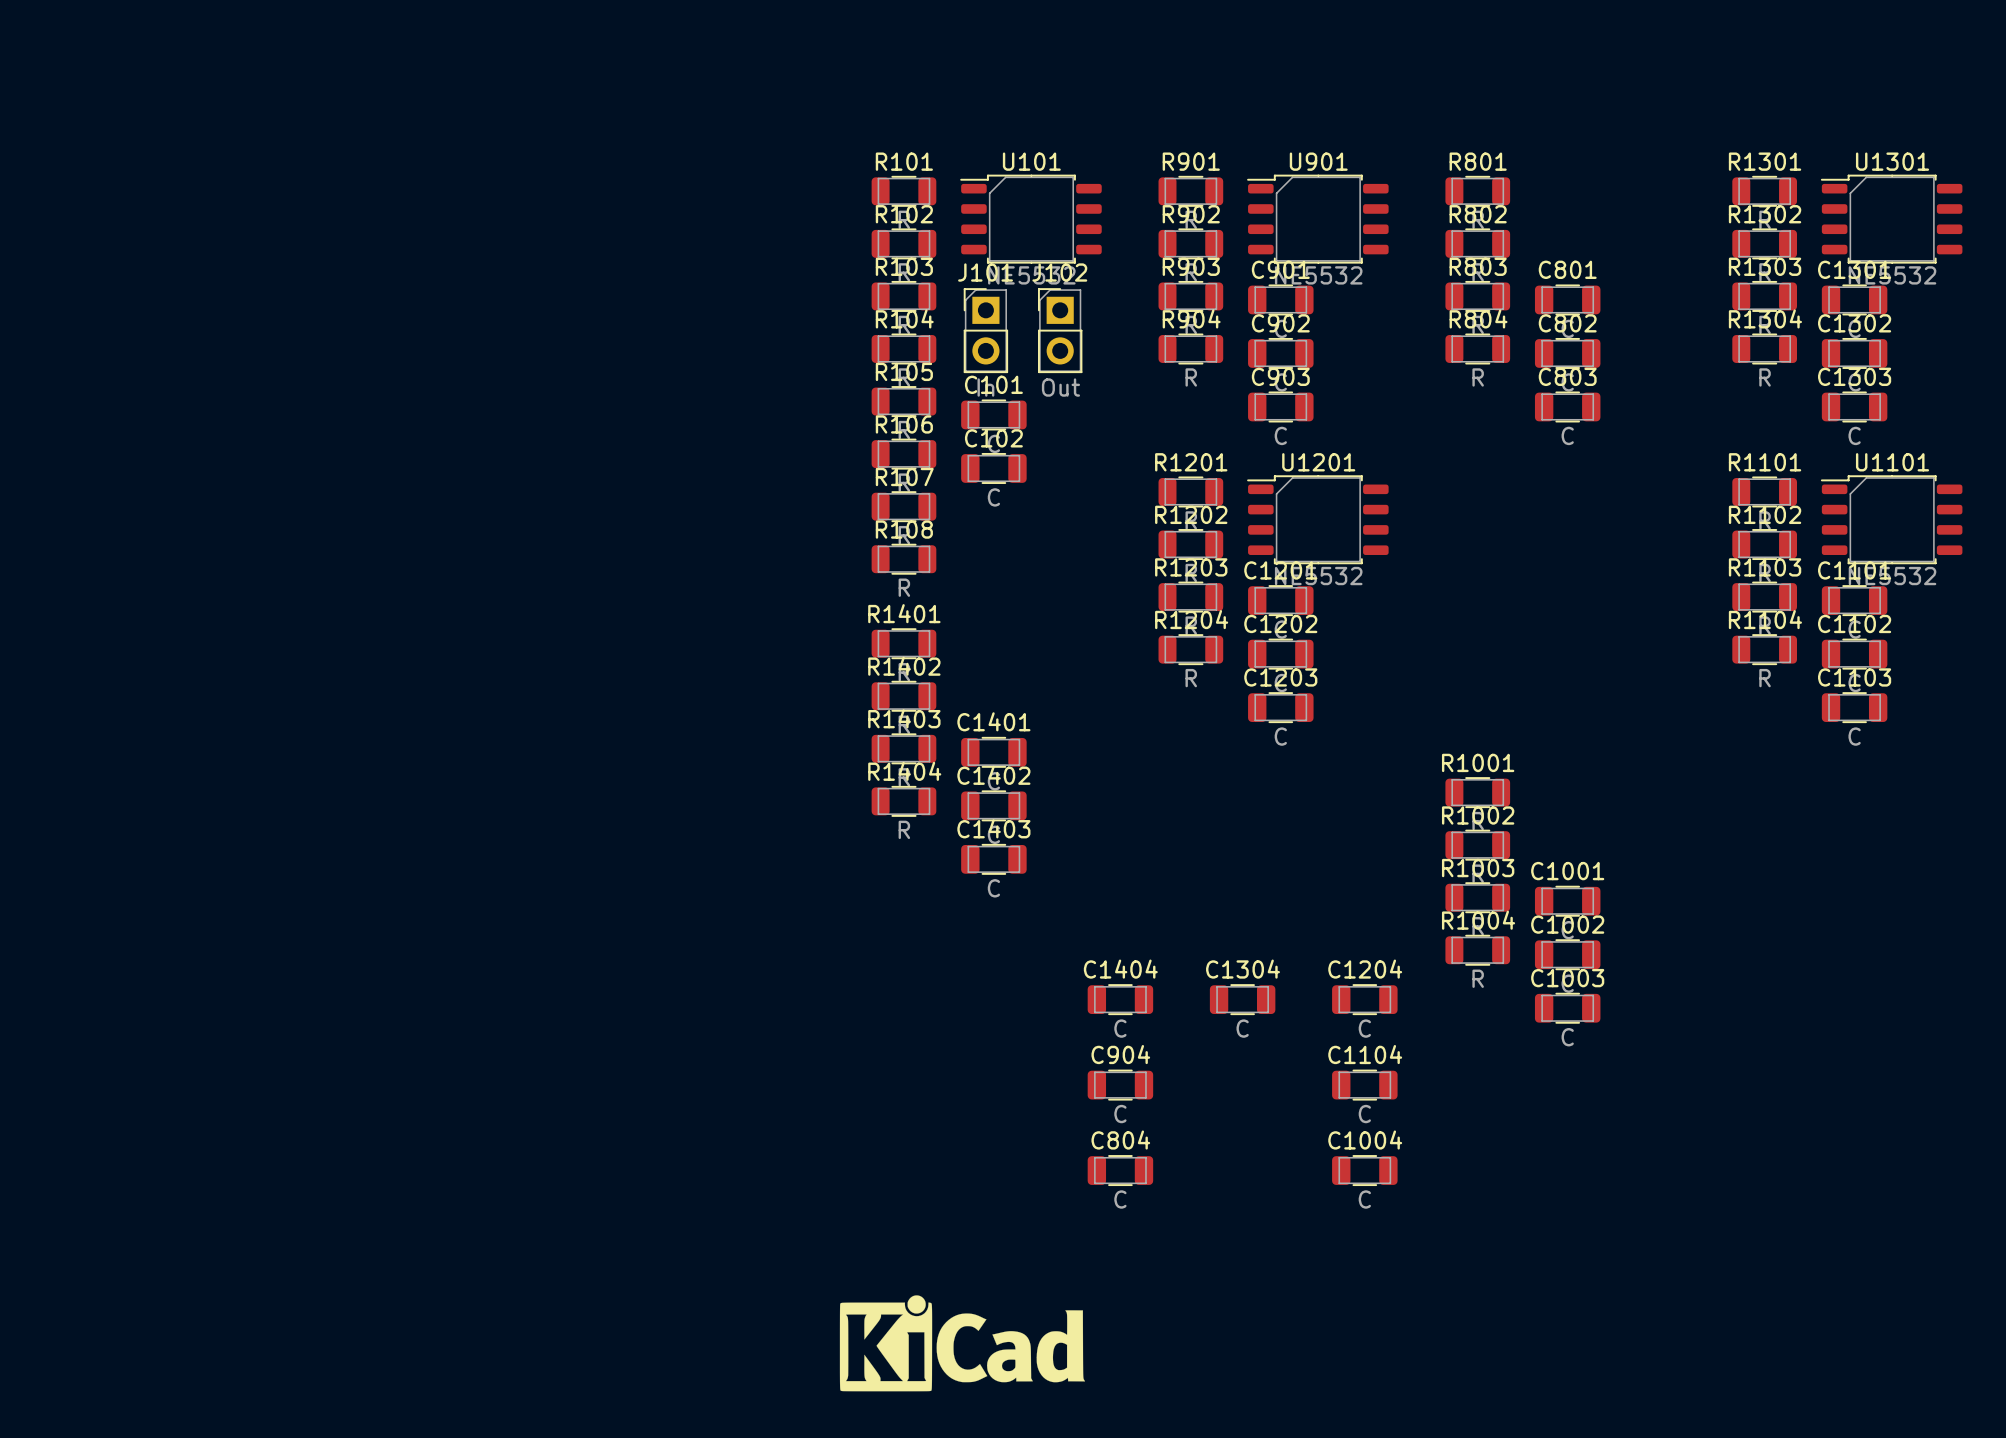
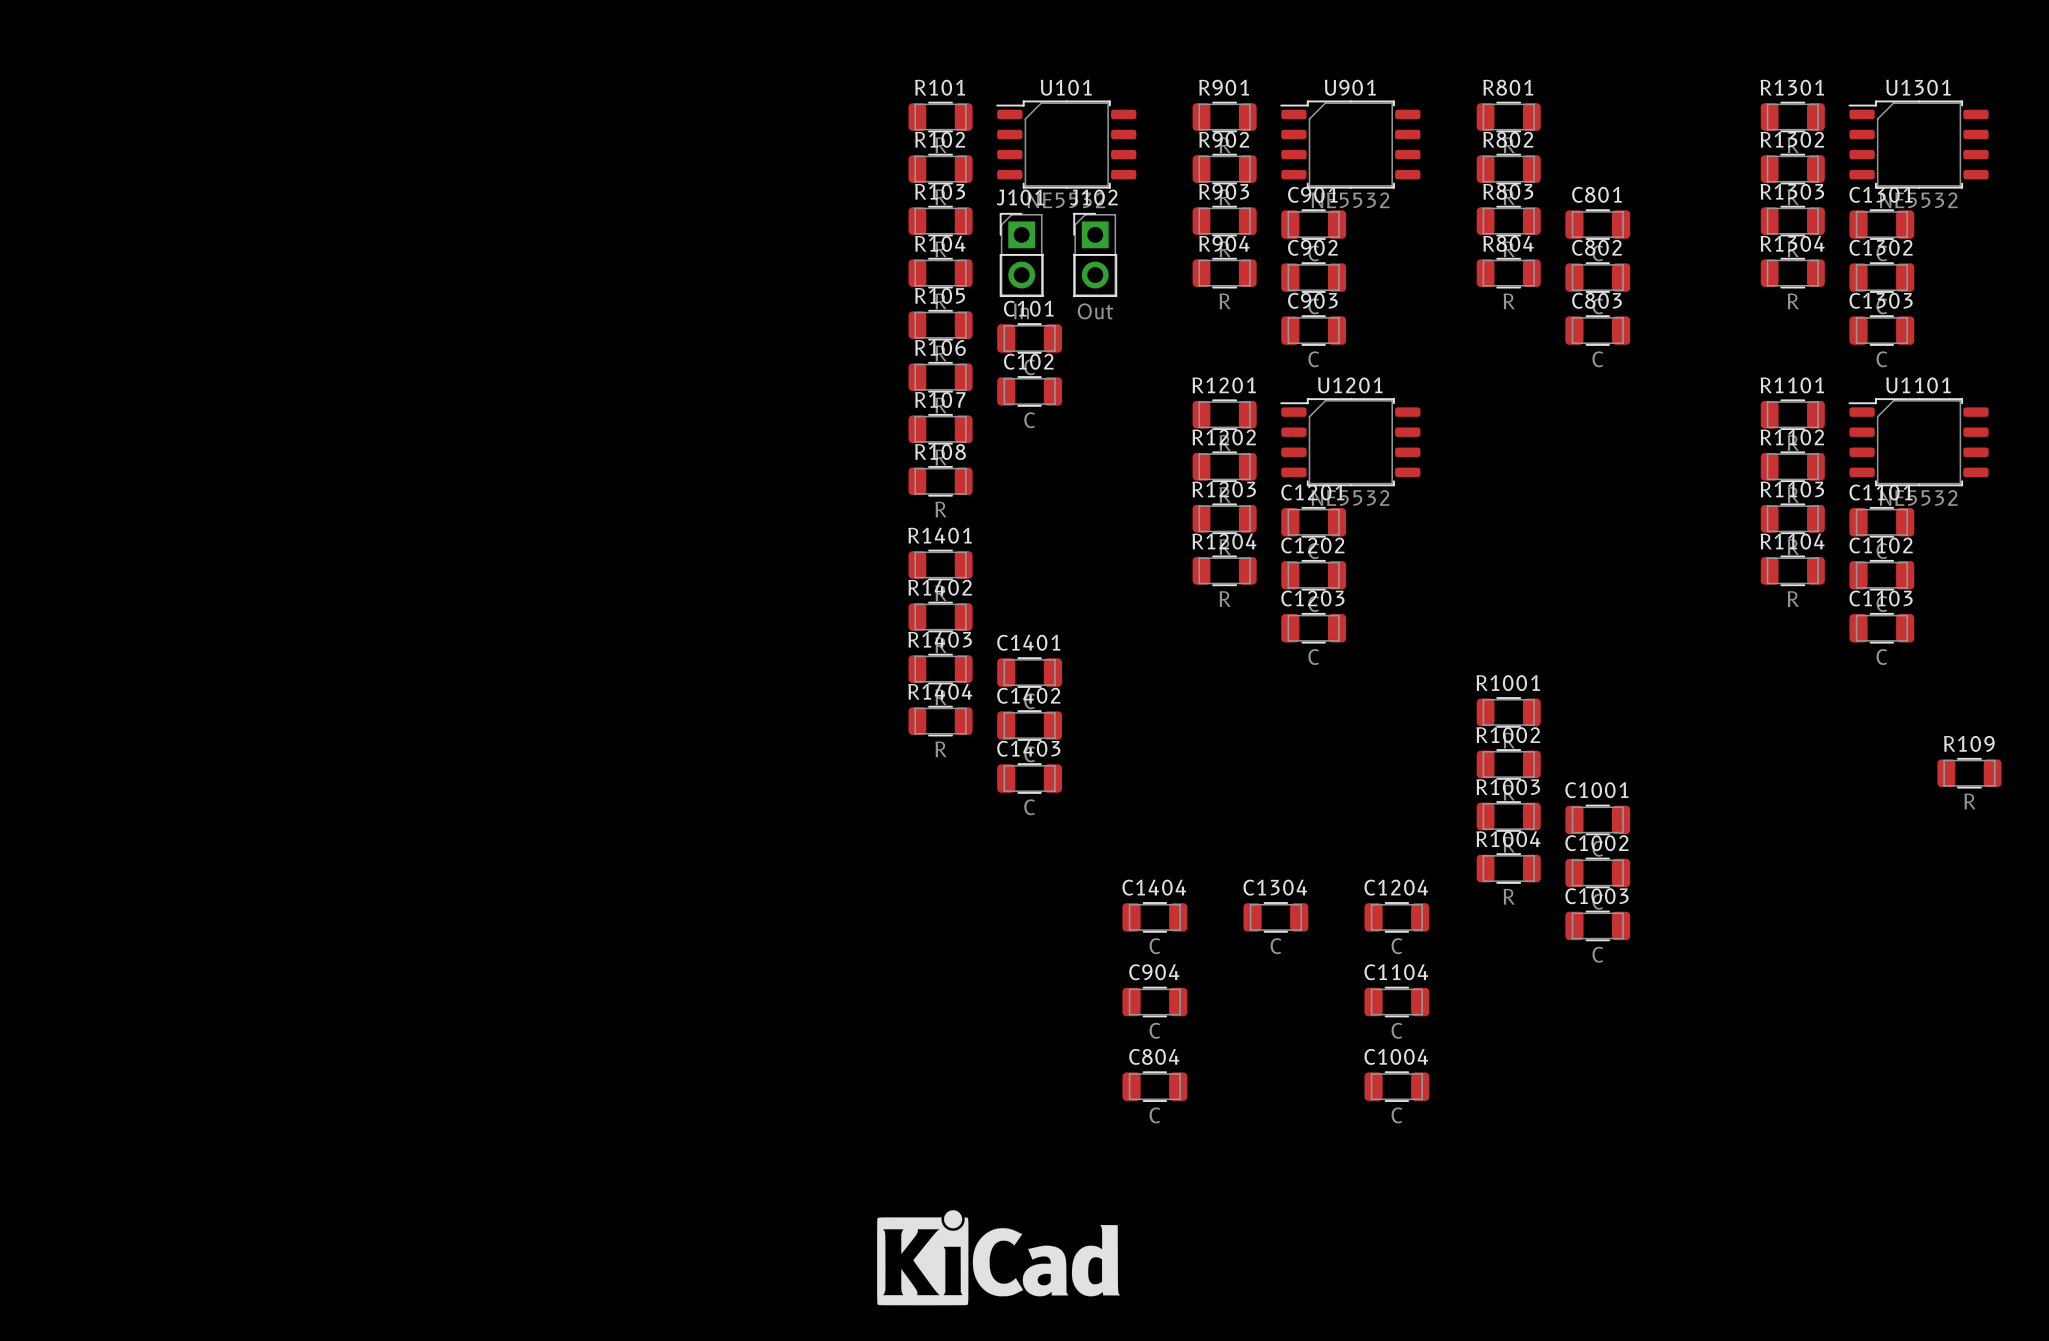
R109: none -> R (1969, 773)

